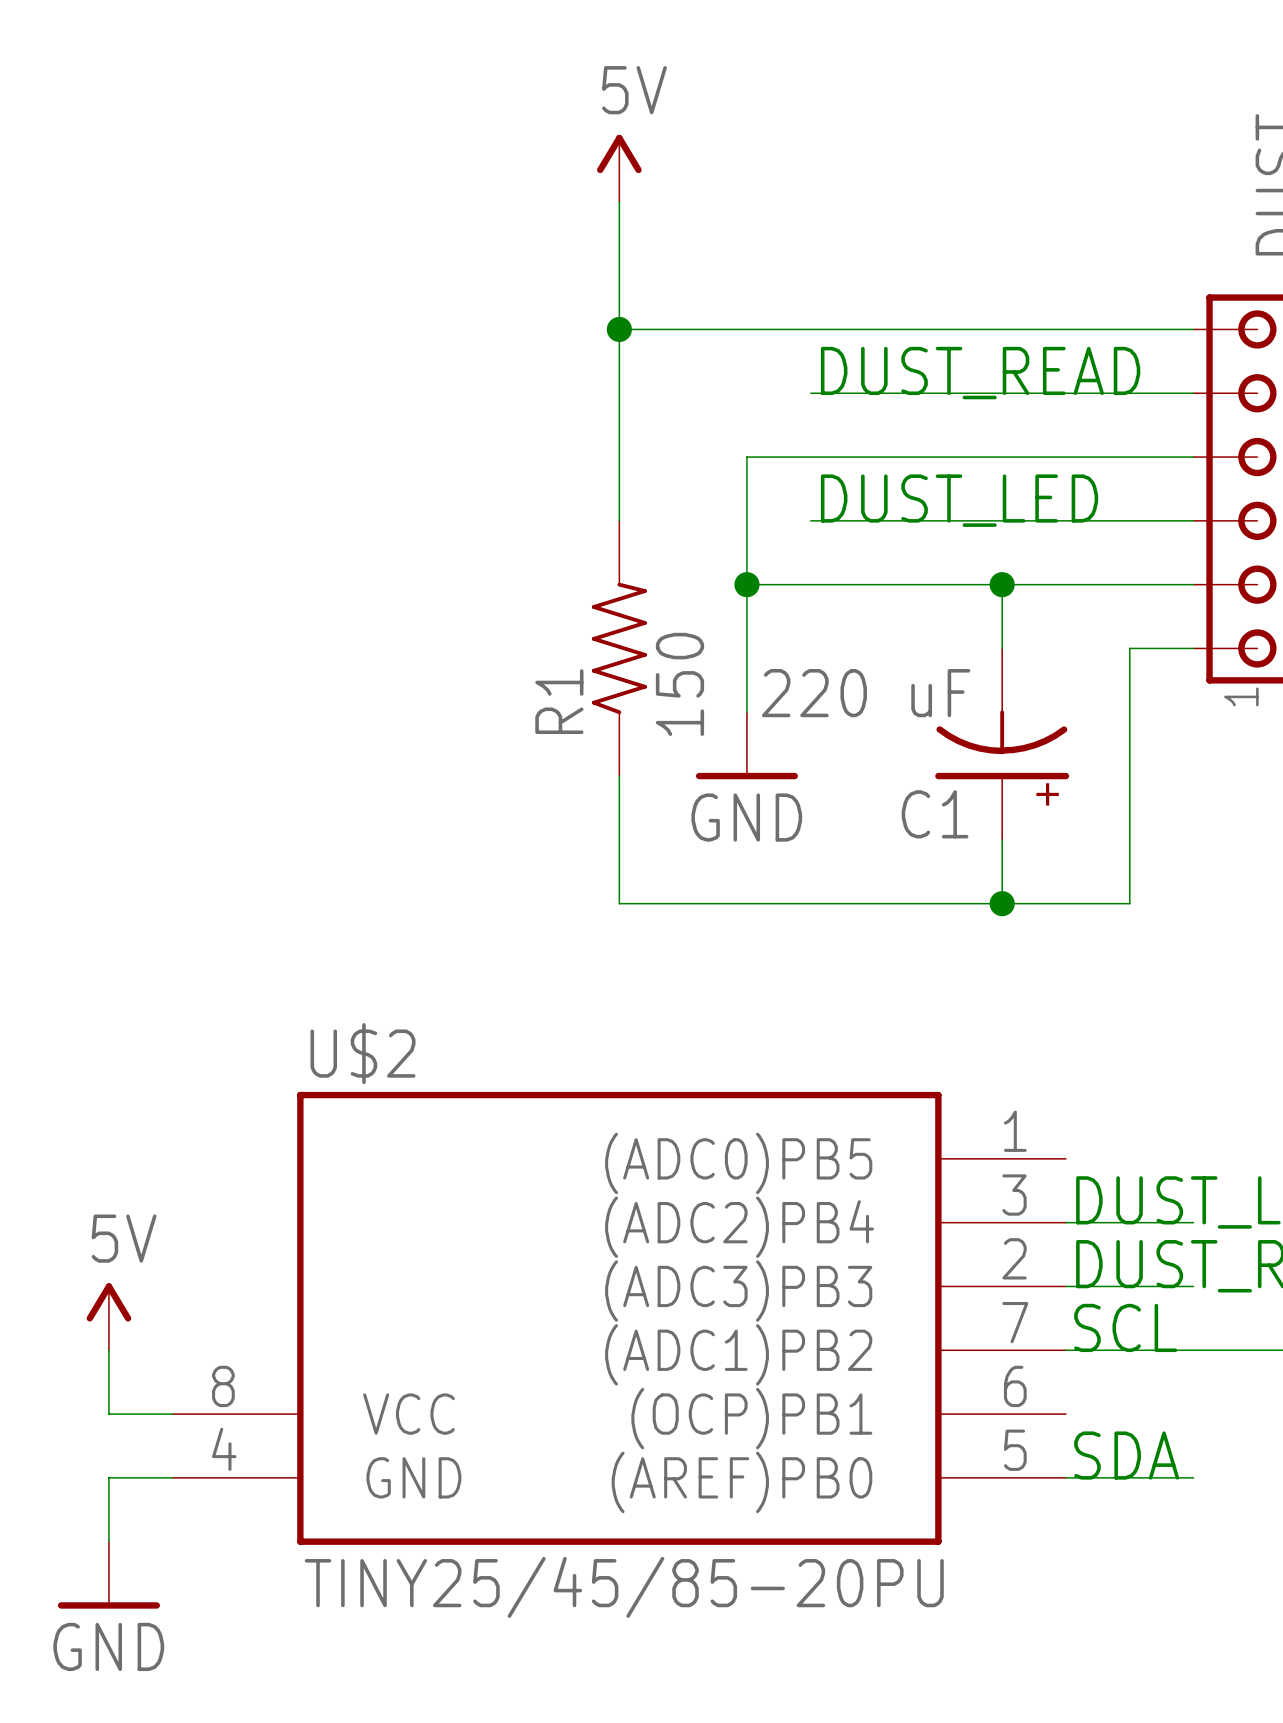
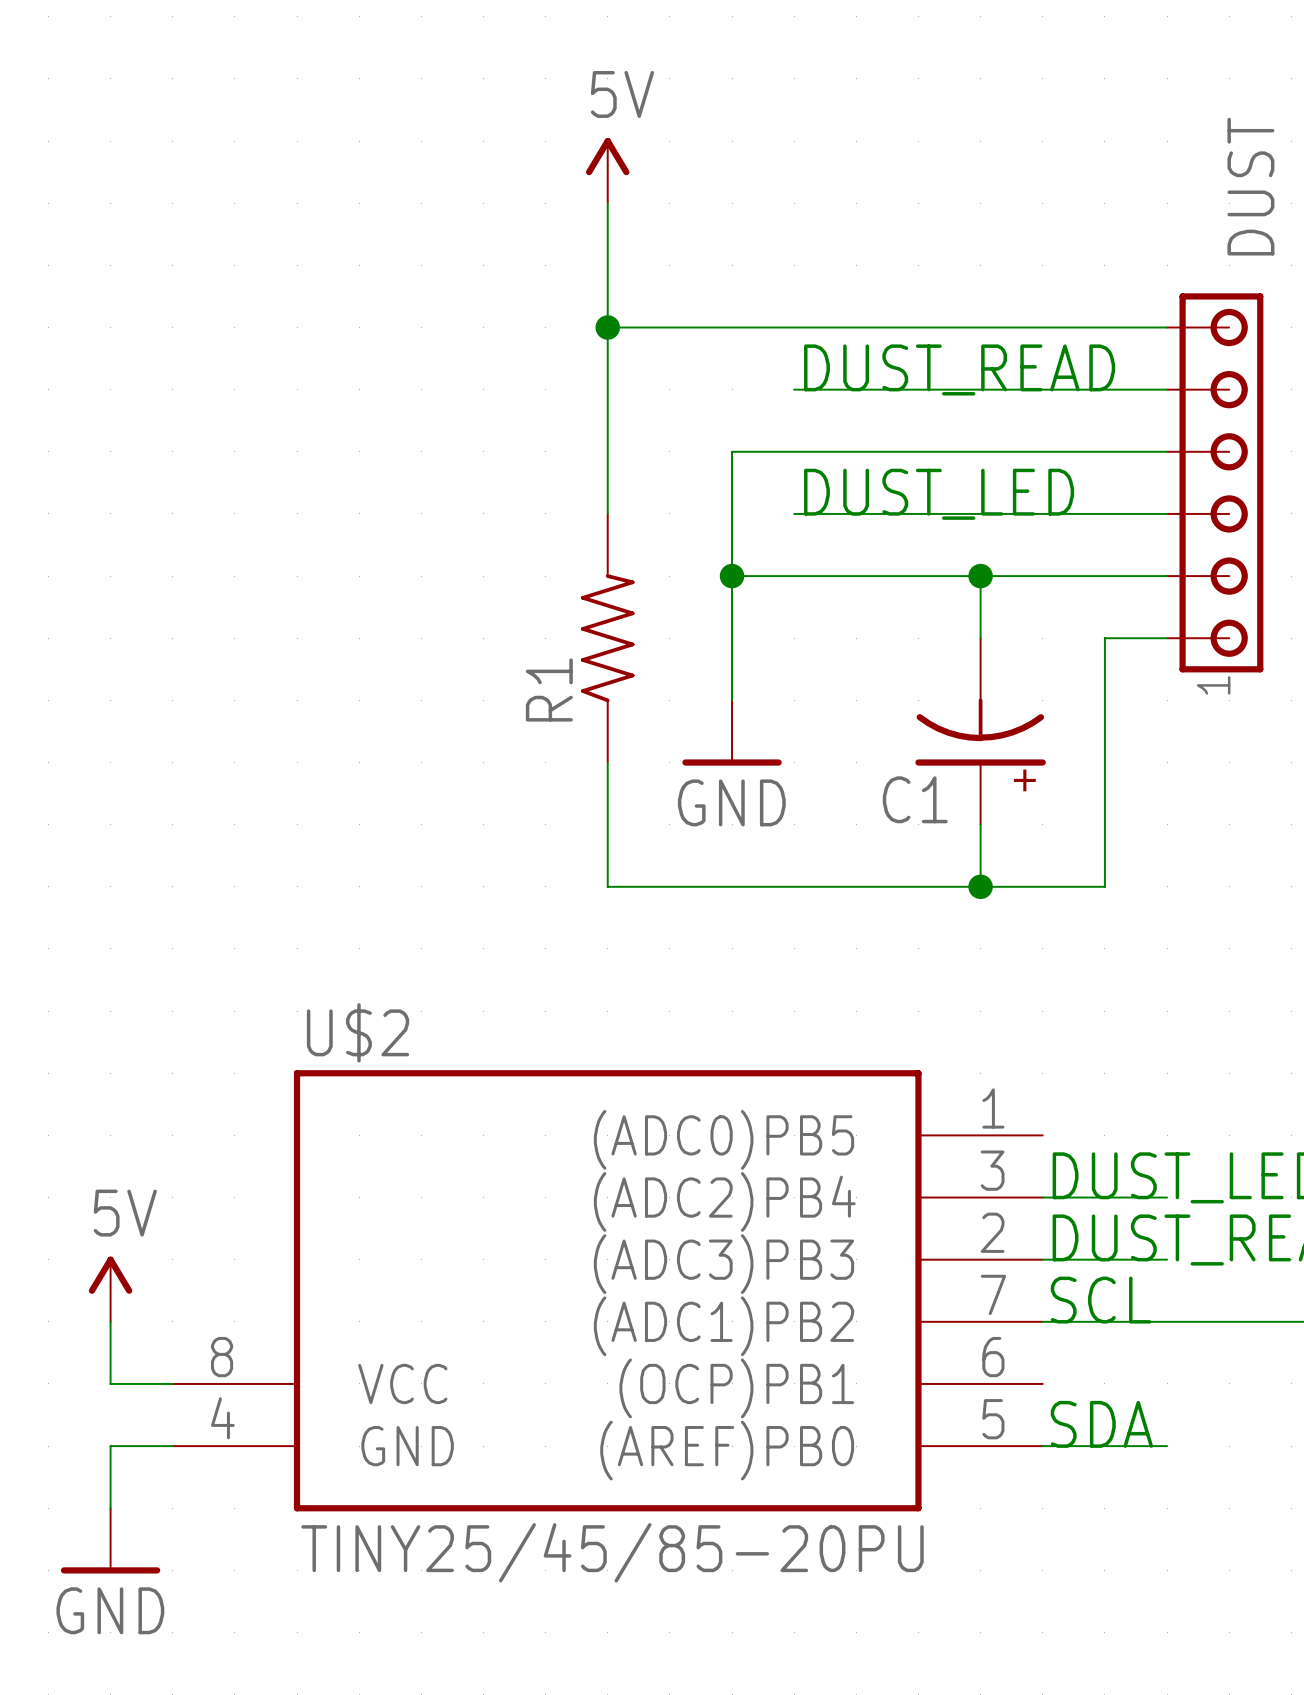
R1 value: 150 (679, 684) -> none
C1 value: 220 uF (866, 693) -> none

